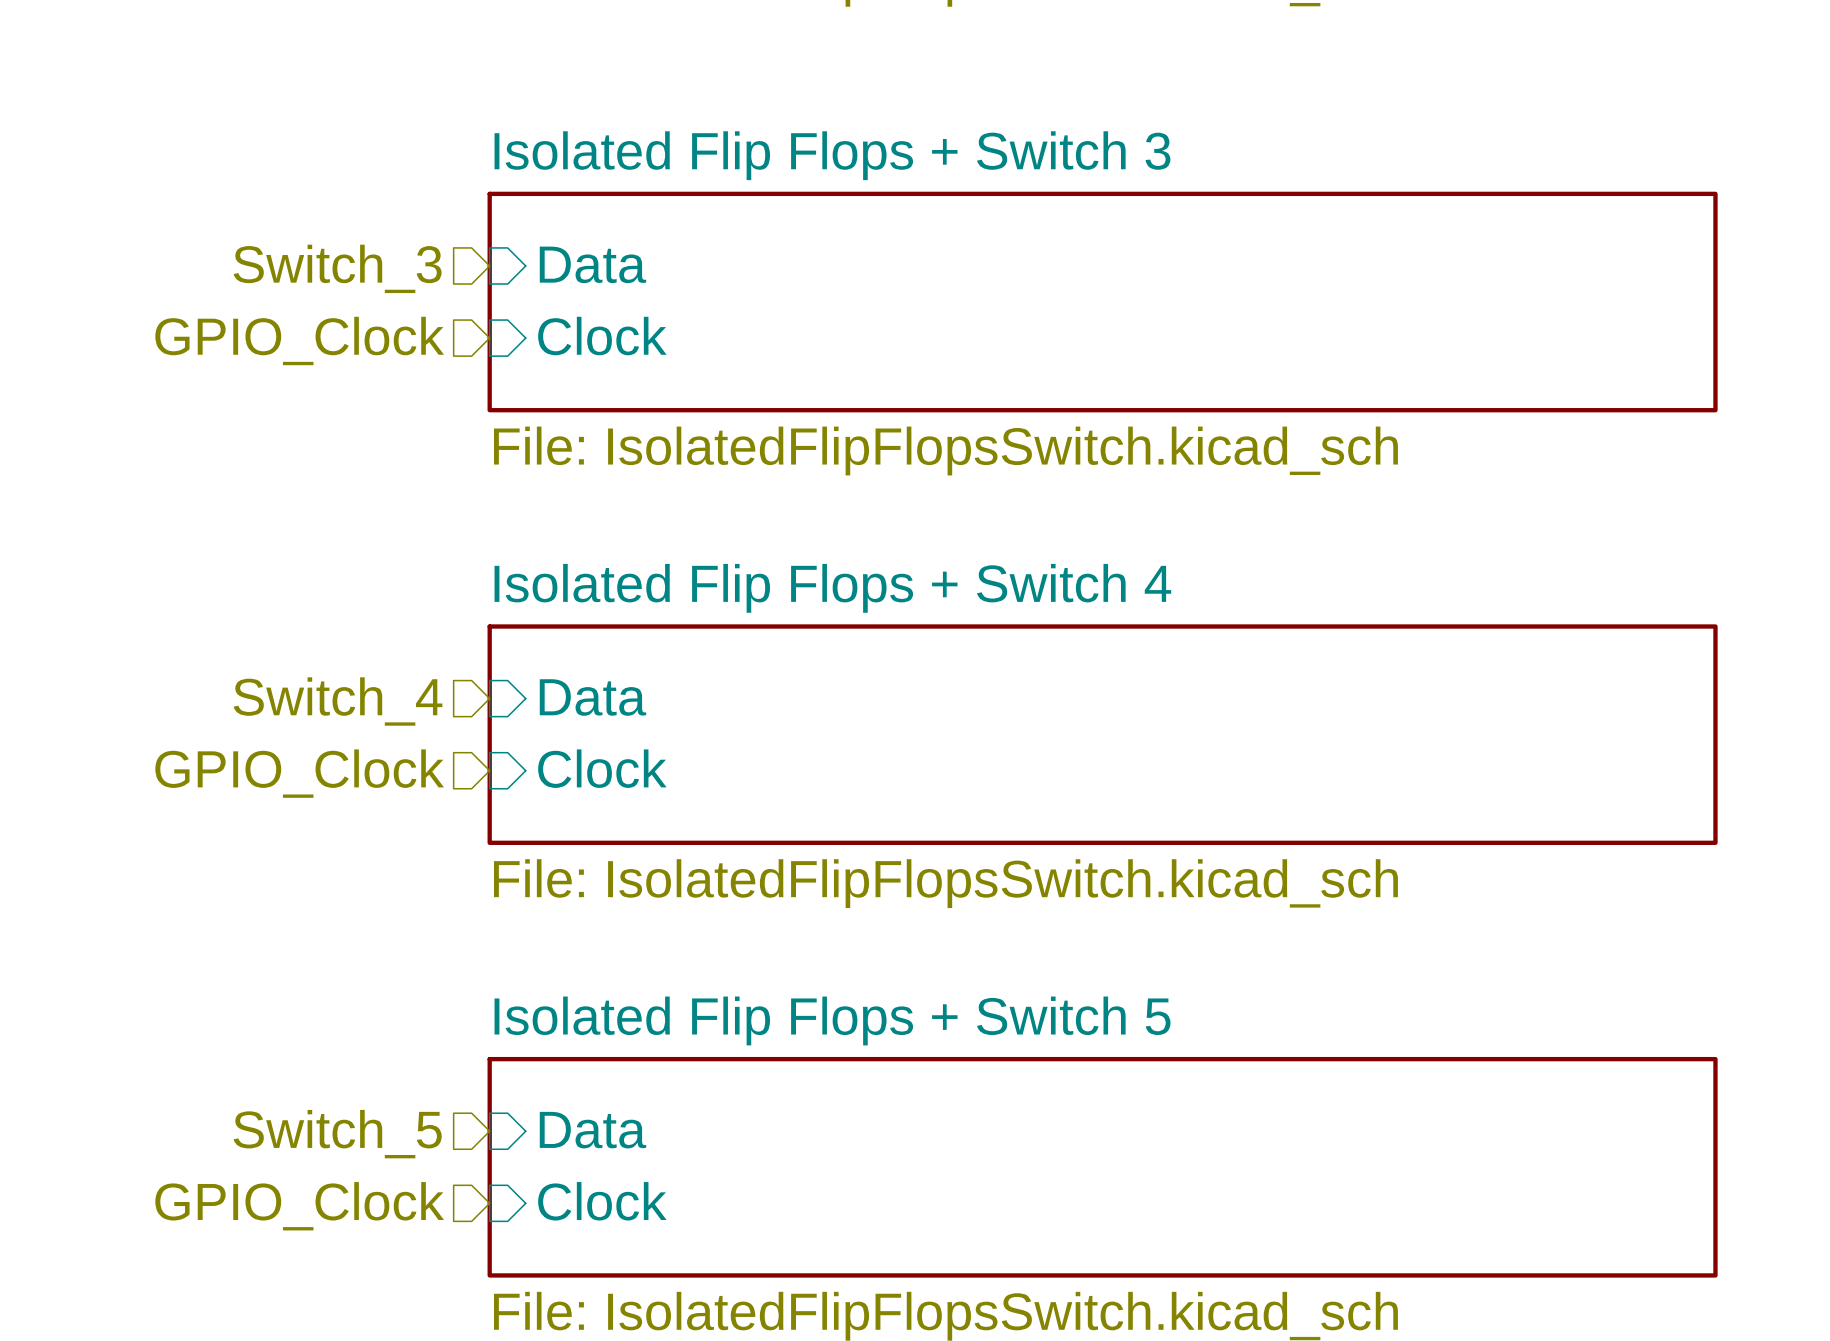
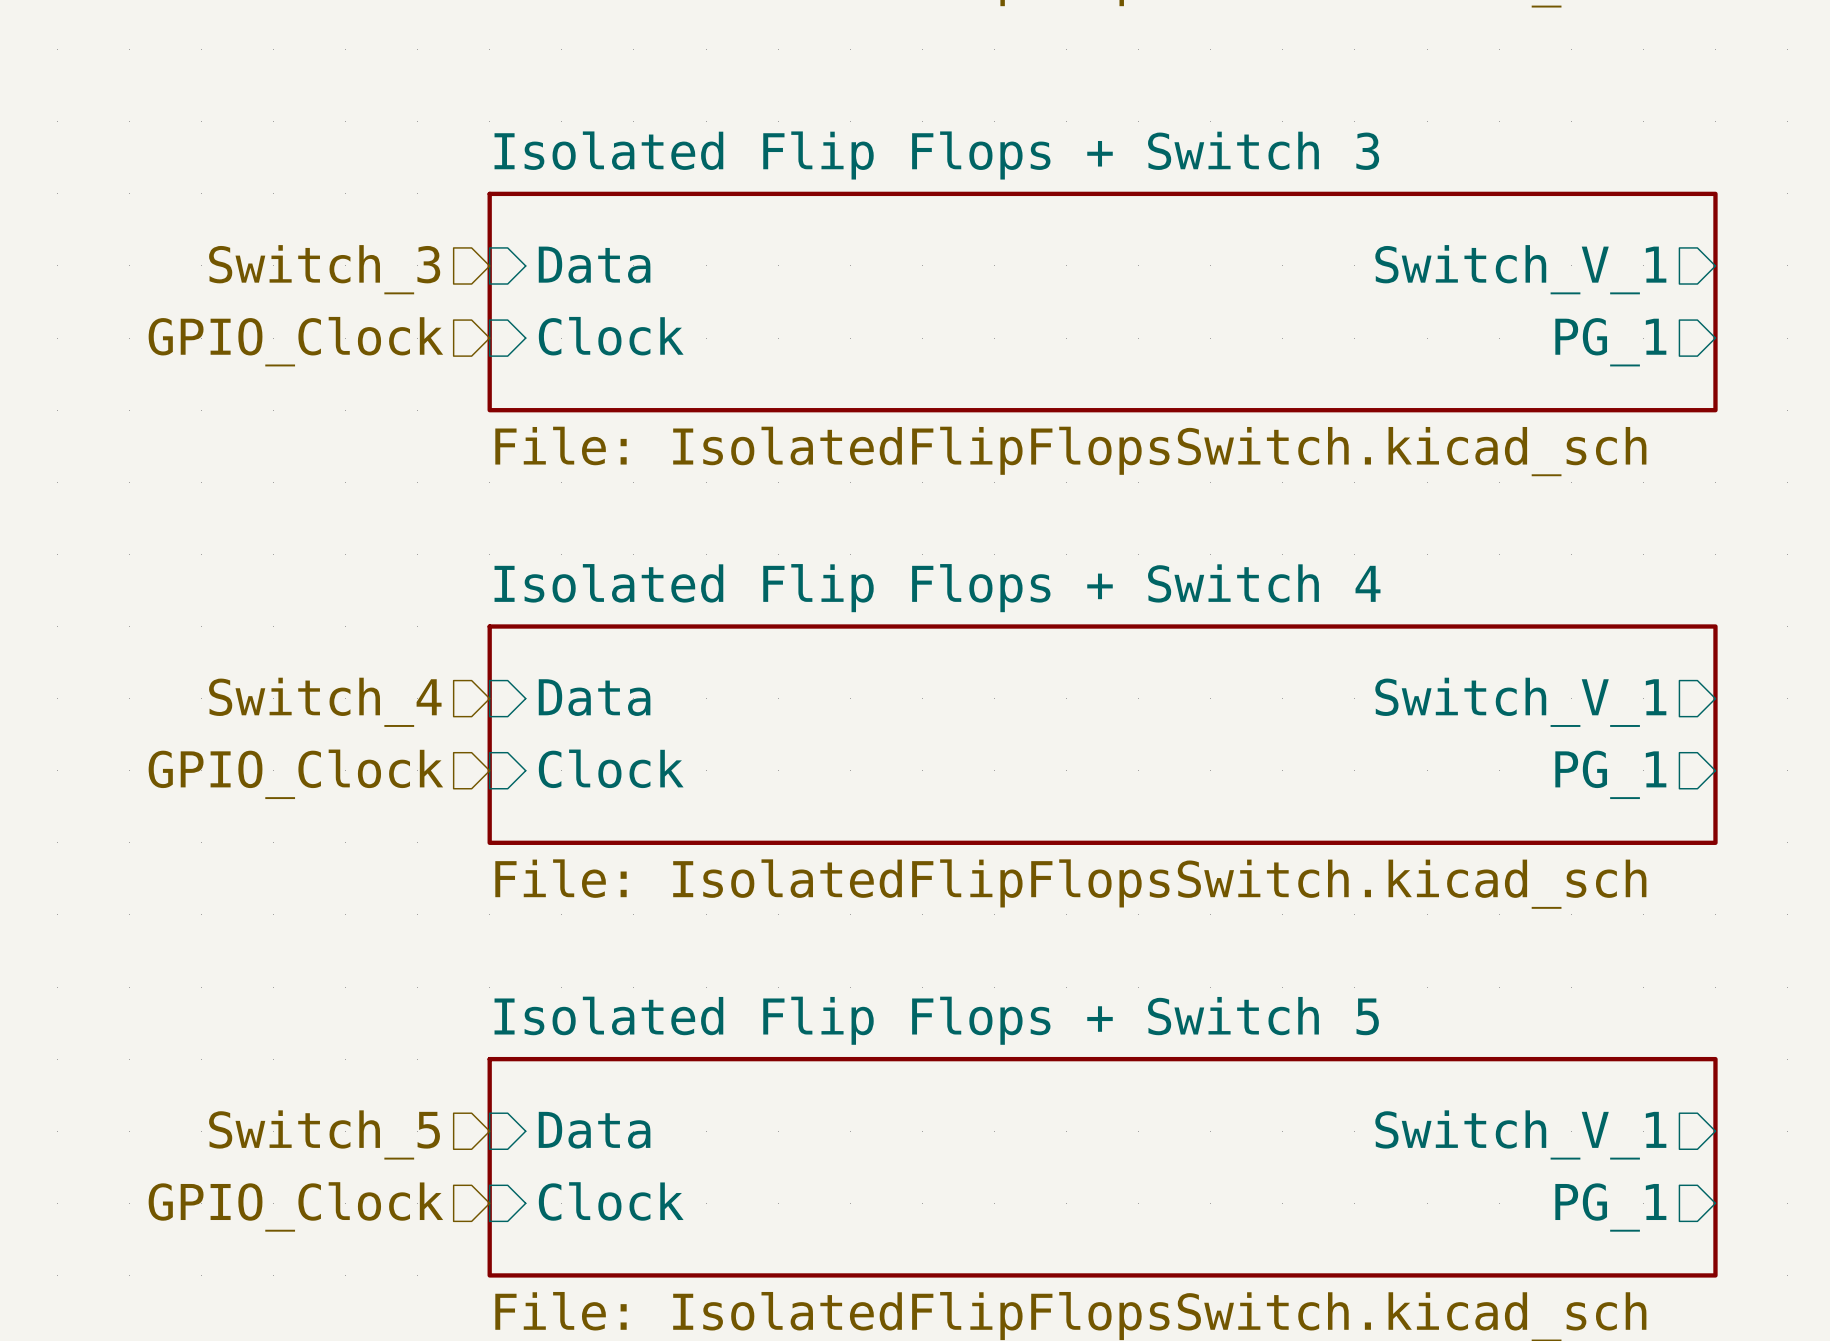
sheet pin: none -> Switch_V_1 (1520, 269)
sheet pin: none -> PG_1 (1610, 342)
sheet pin: none -> Switch_V_1 (1520, 702)
sheet pin: none -> PG_1 (1610, 774)
sheet pin: none -> Switch_V_1 (1520, 1134)
sheet pin: none -> PG_1 (1610, 1207)

